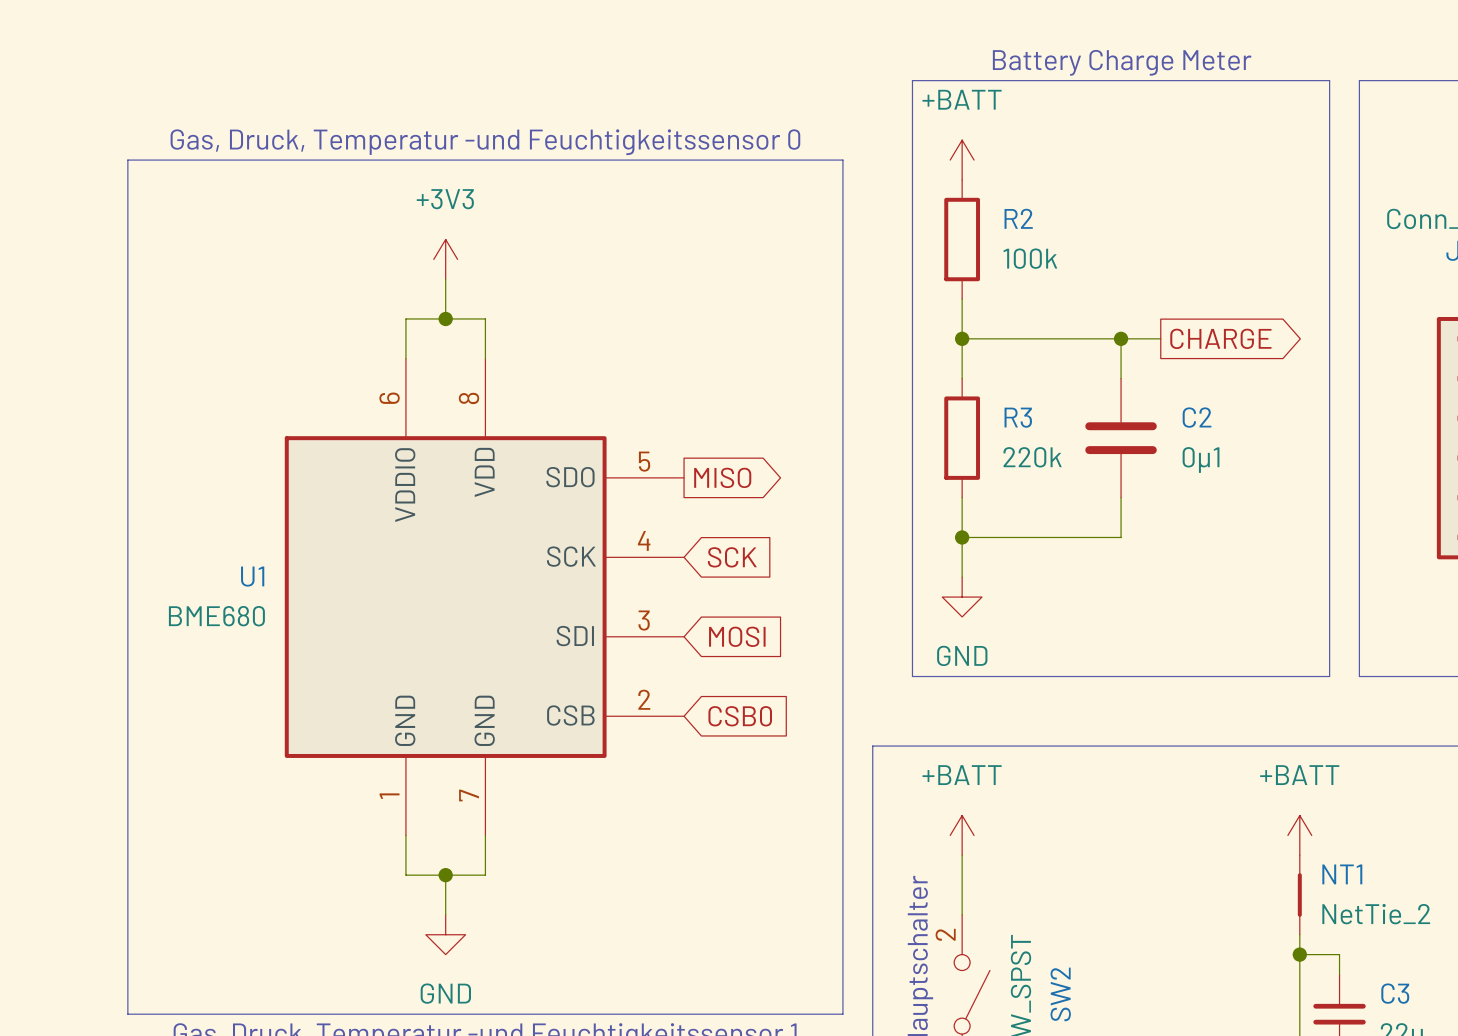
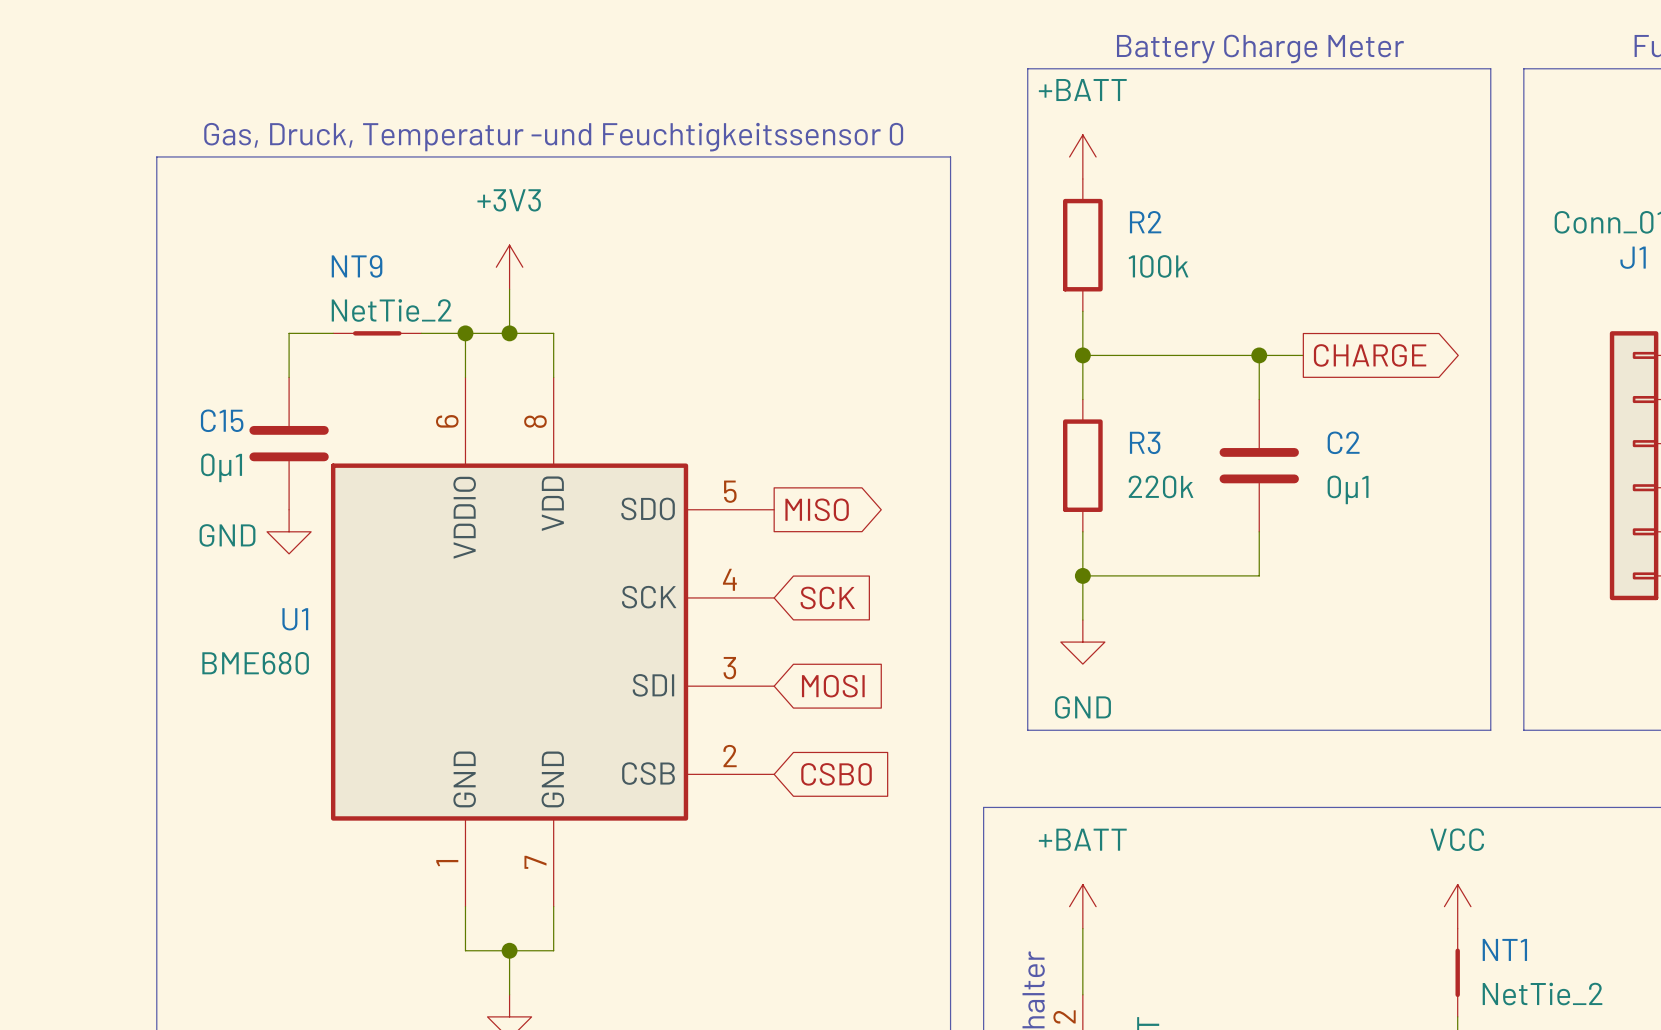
wire: none -> (333, 333) (289, 333) (289, 377)
NT9: none -> NetTie_2 (377, 333)
wire: none -> (421, 333) (465, 333)
junction: none -> (465, 333)
C15: none -> 0µ1 (289, 443)
power symbol: none -> GND (289, 531)
power symbol: +BATT (1299, 835) -> VCC (1457, 906)

